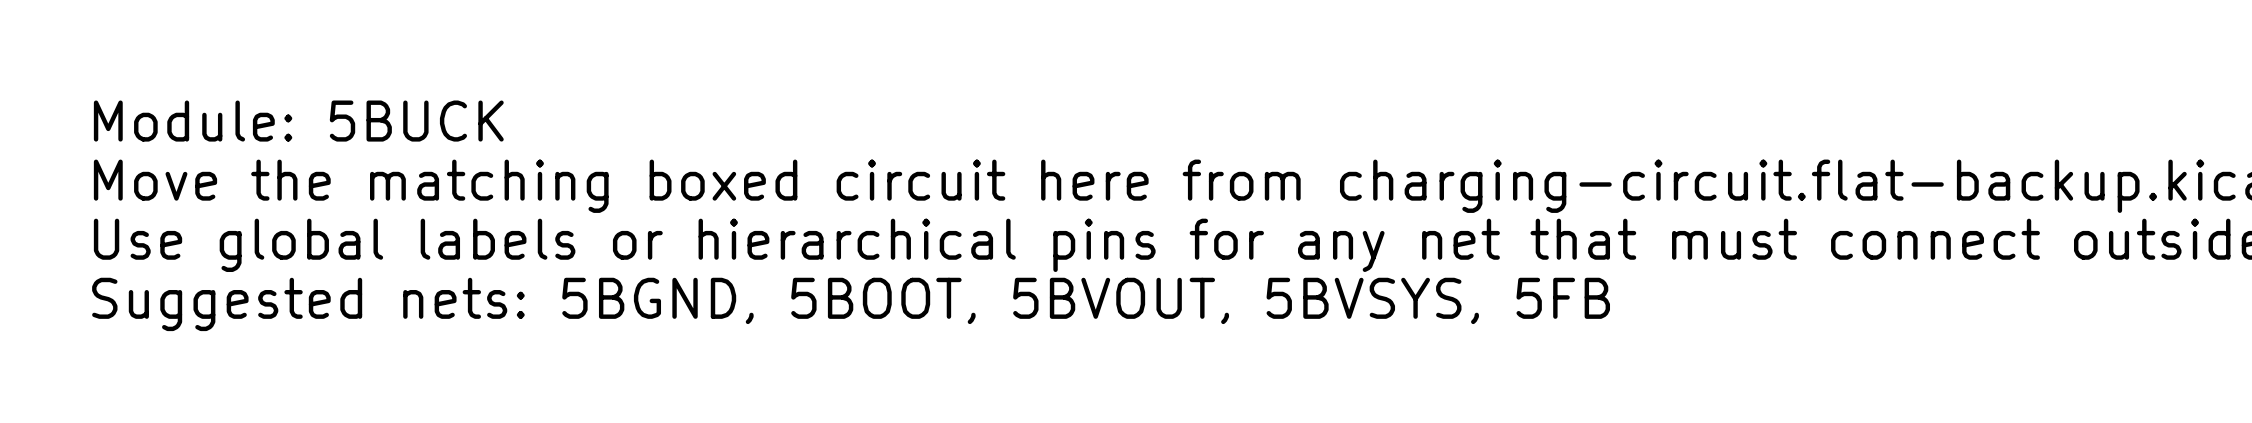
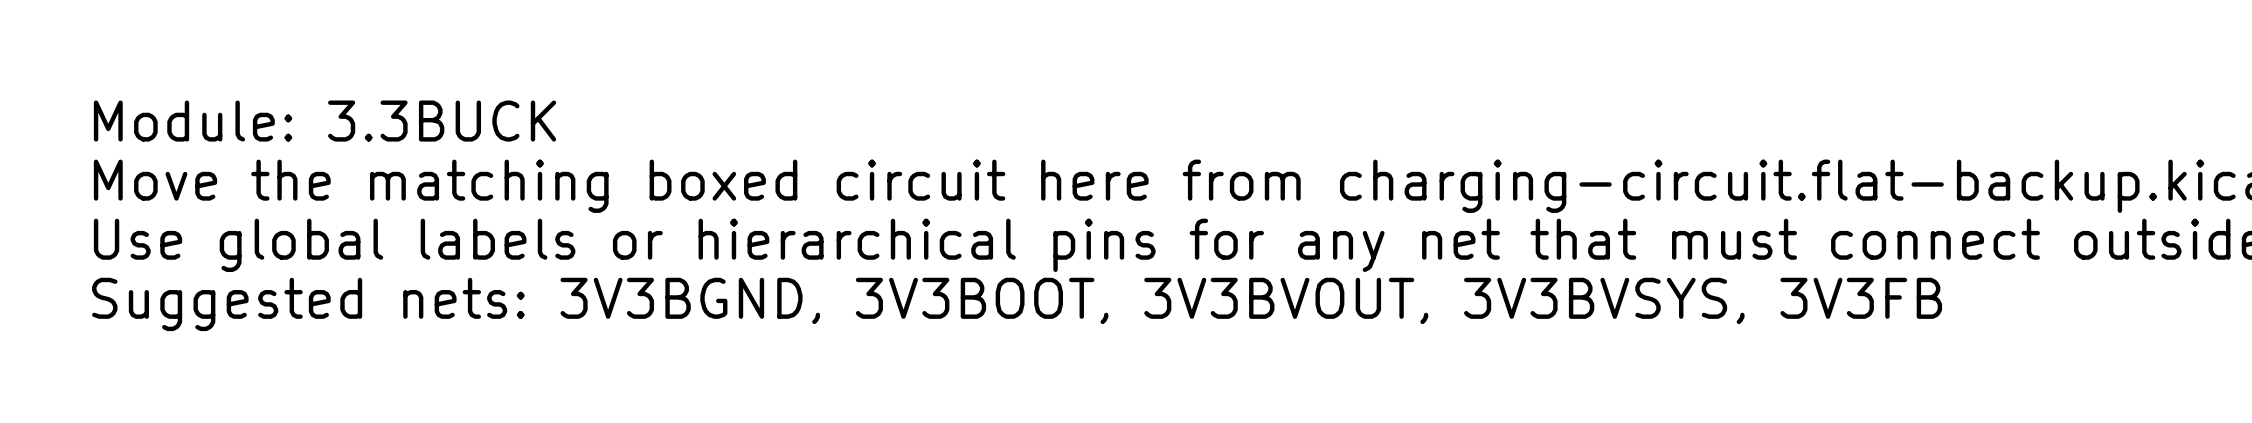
text: Module: 5BUCK (298, 121) -> Module: 3.3BUCK (325, 121)
text: Suggested nets: 5BGND, 5BOOT, 5BVOUT, 5BVSYS, 5FB (851, 304) -> Suggested nets: 3V3BGND, 3V3BOOT, 3V3BVOUT, 3V3BVSYS, 3V3FB (1017, 304)

